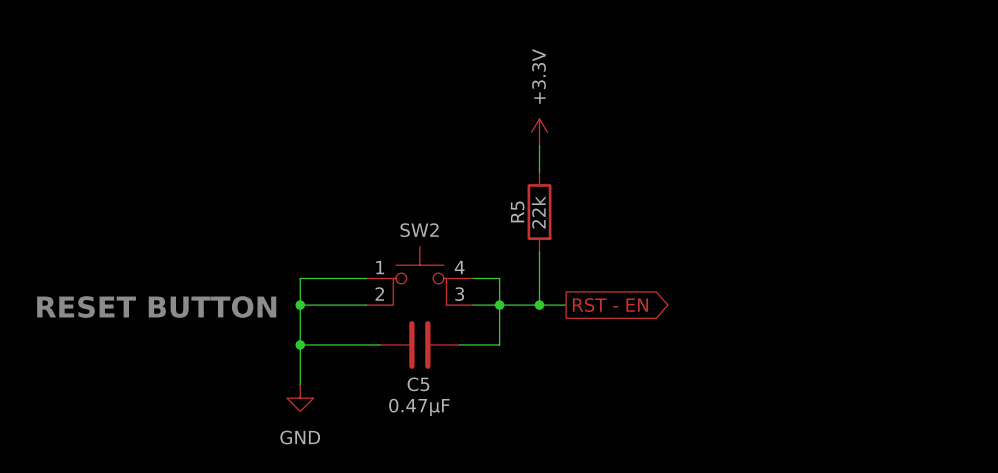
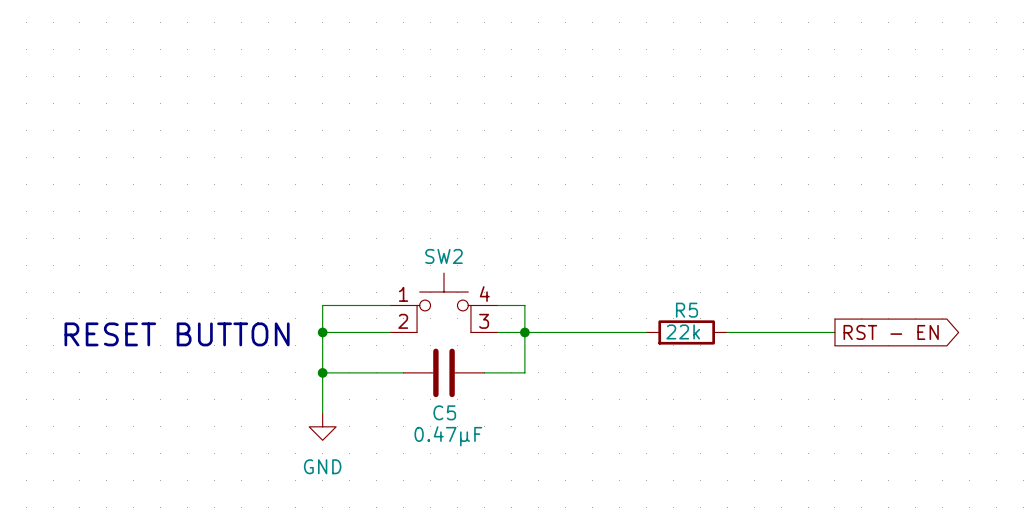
power symbol: +3.3V (539, 132) -> none
wire: (539, 145) (539, 172) -> none
R5 rotation: 0° (539, 212) -> 90° clockwise (686, 332)
R5 position: (539, 212) -> (686, 332)
wire: (539, 251) (539, 305) -> none
junction: (539, 305) -> none
wire: none -> (592, 332) (646, 332)
global label position: RST - EN (610, 305) -> RST - EN (891, 332)
wire: none -> (727, 332) (834, 332)

